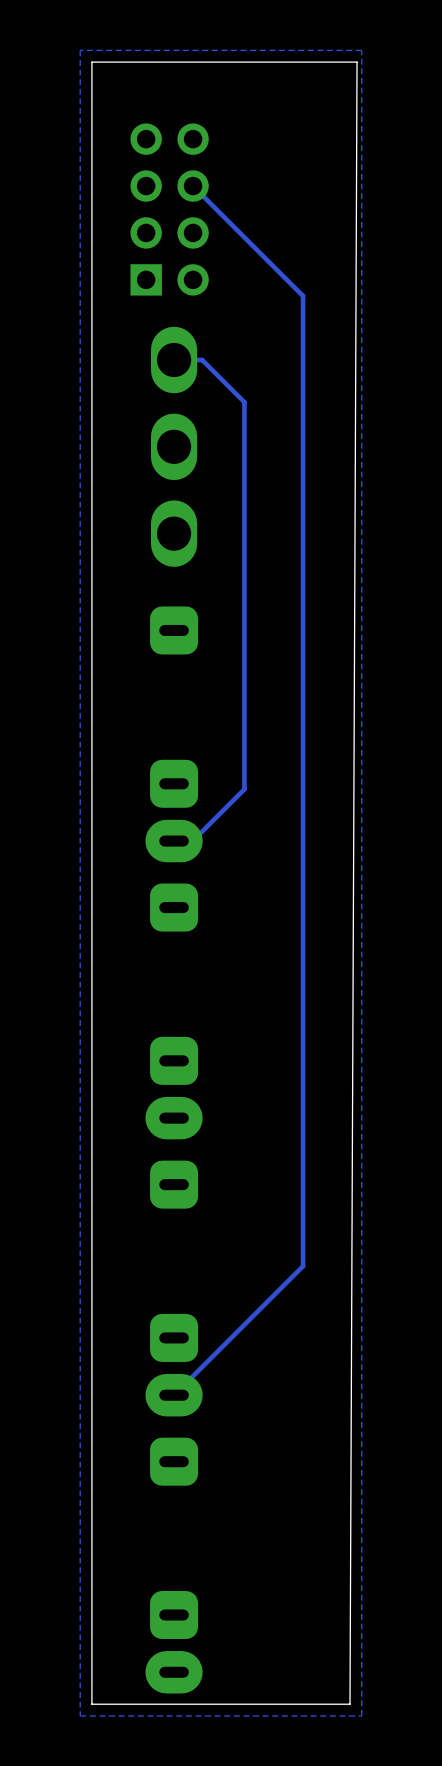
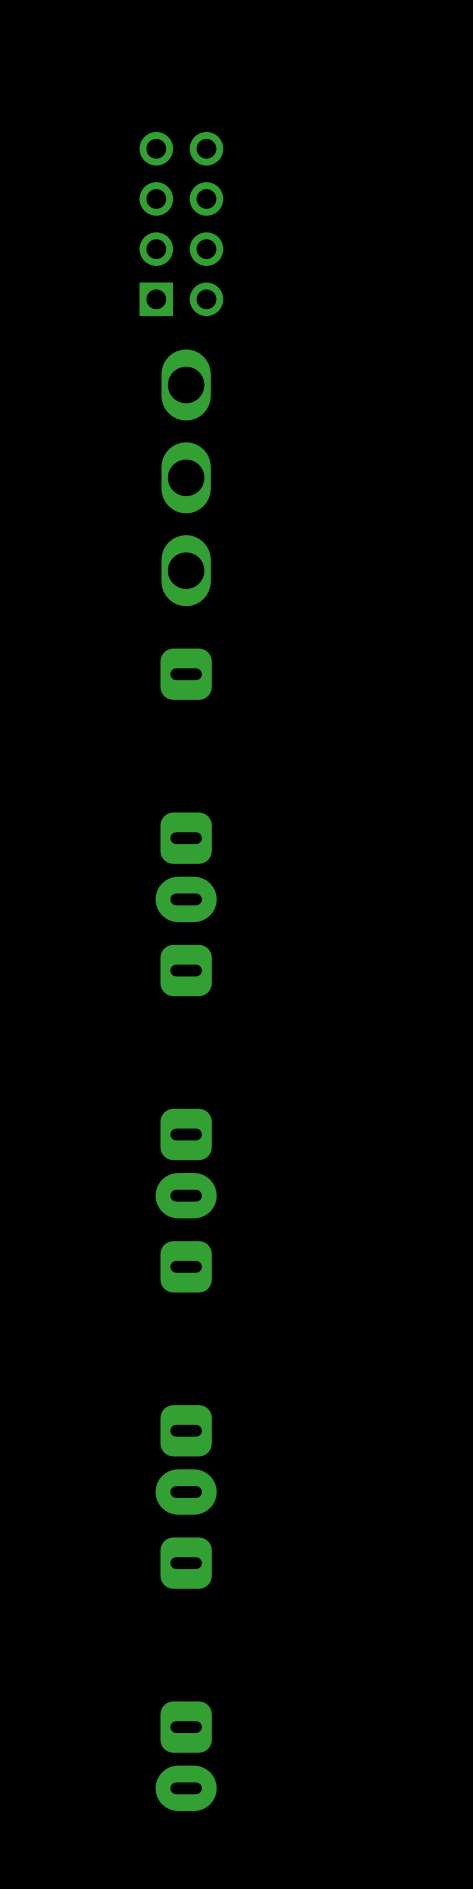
zone outline: (361, 50) (361, 1715) (80, 1715) (80, 50) (361, 50) -> none
board edge: (357, 62) (349, 1704) (91, 1704) (91, 62) (357, 62) -> none
track: (193, 186) (303, 296) (303, 1266) (174, 1395) -> none
track: (174, 360) (202, 360) (244, 402) (244, 789) (192, 841) (174, 841) -> none

